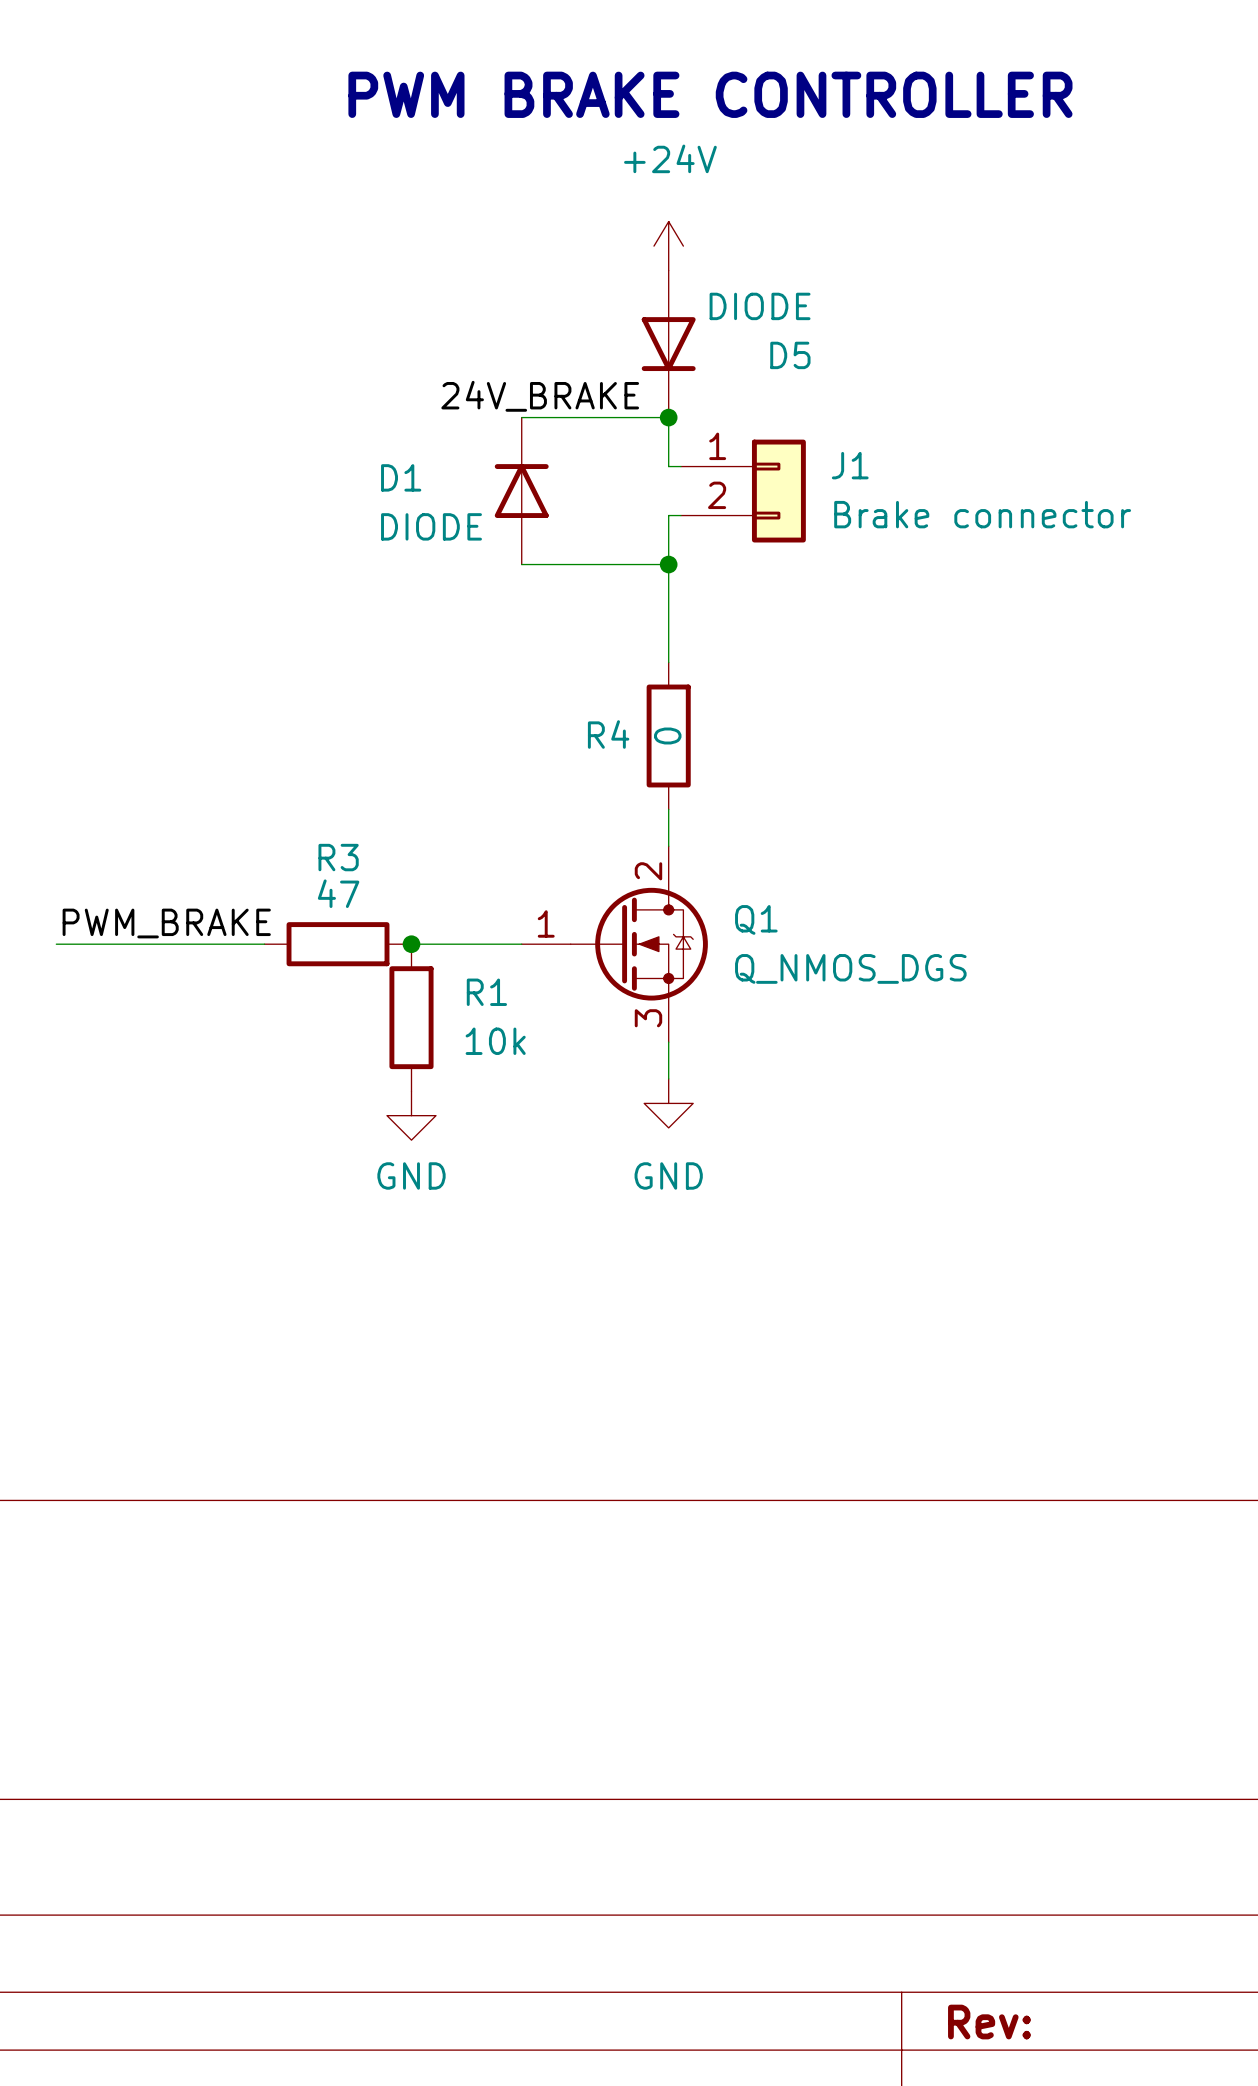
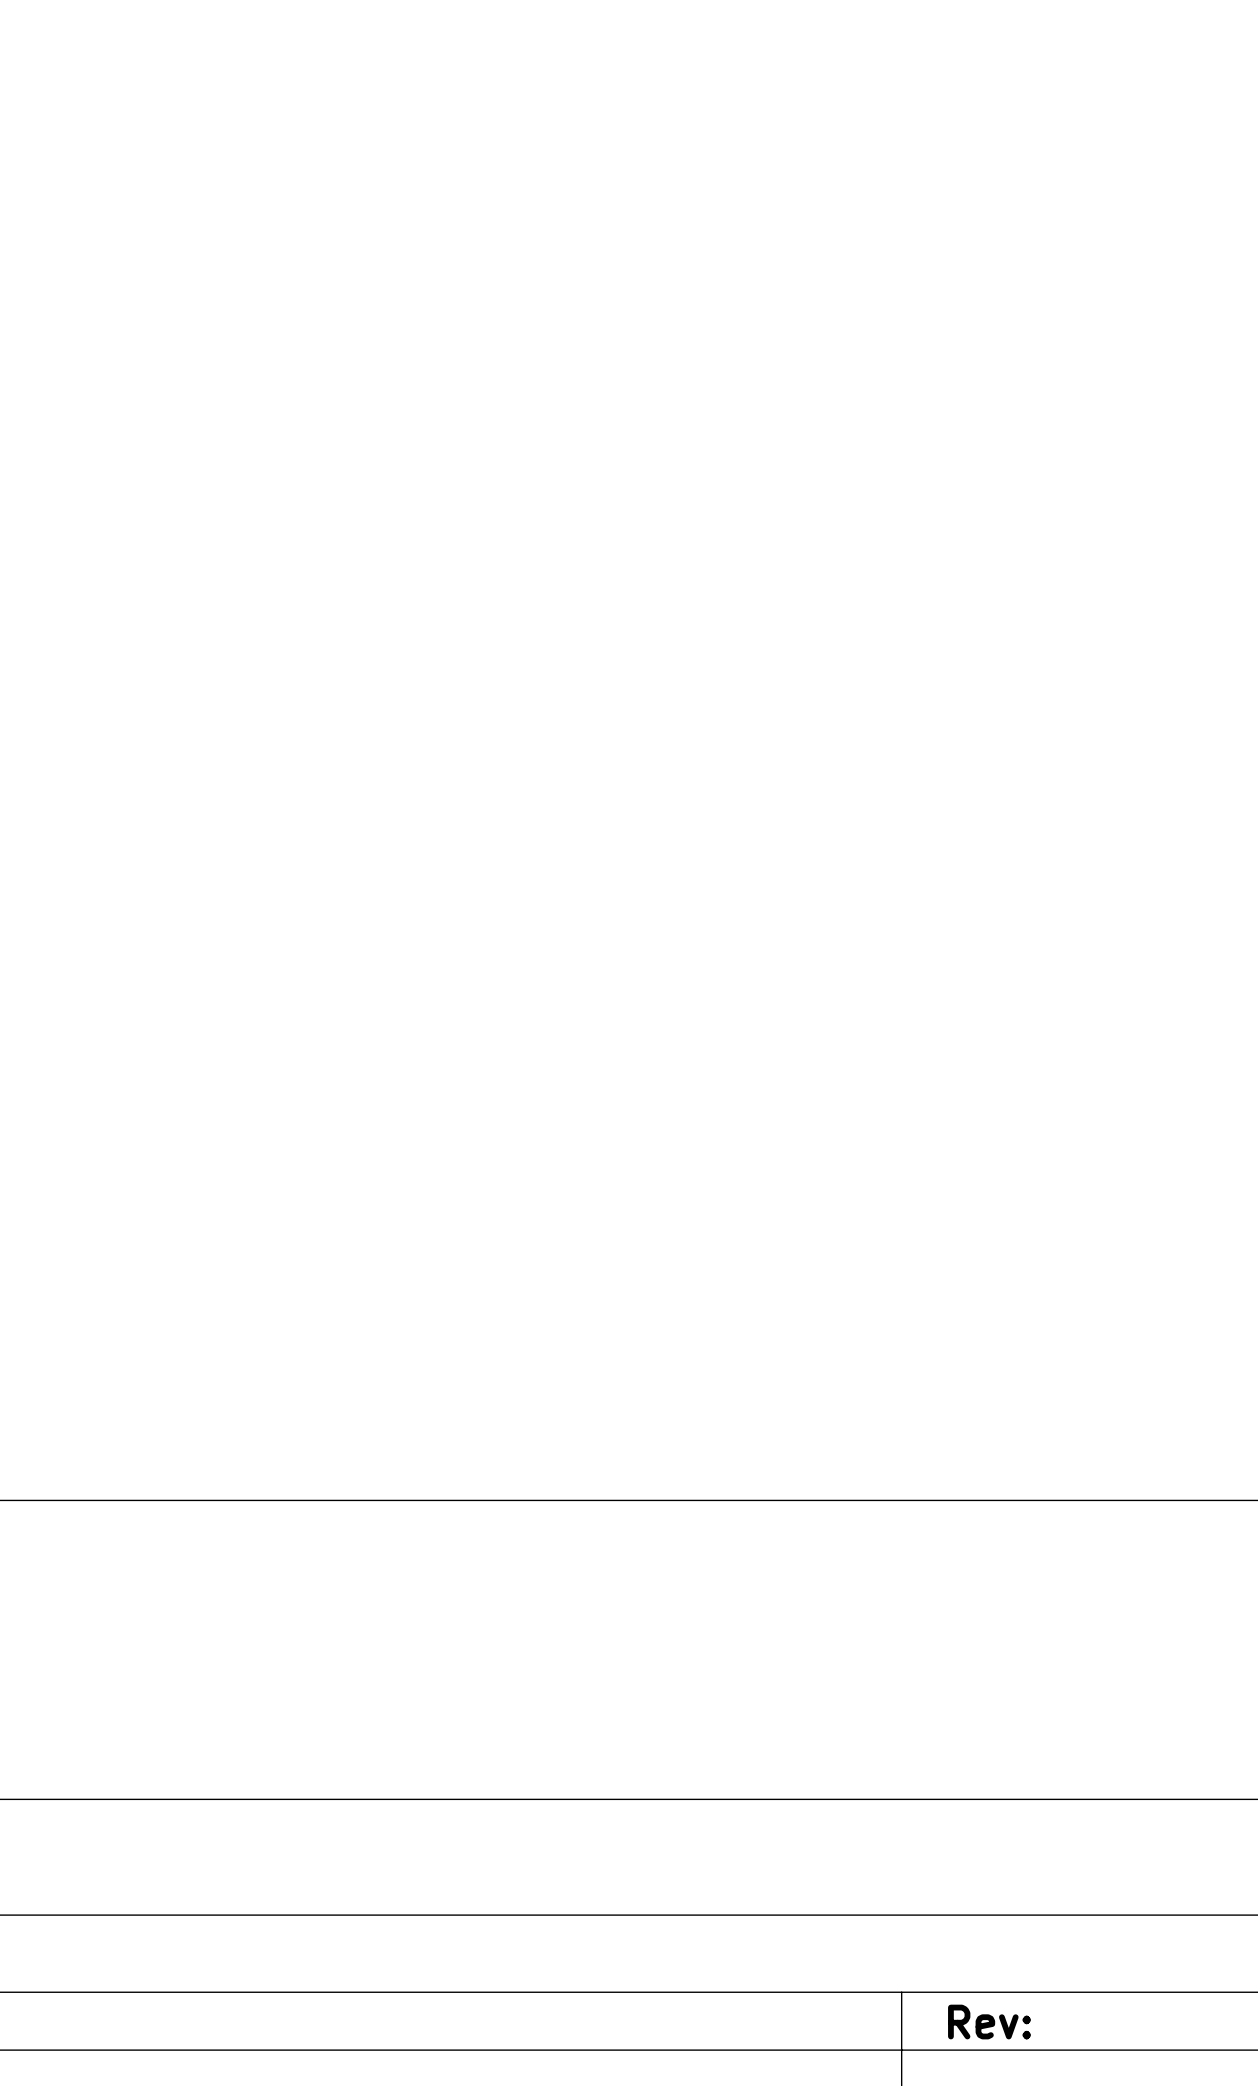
text: PWM BRAKE CONTROLLER (710, 94) -> none
power symbol: +24V (668, 246) -> none
D5: DIODE (668, 344) -> none
label: 24V_BRAKE (540, 396) -> none
wire: (521, 417) (668, 417) (668, 466) (680, 466) -> none
junction: (668, 417) -> none
D1: DIODE (521, 491) -> none
J1: Brake connector (743, 491) -> none
wire: (680, 515) (668, 515) (668, 662) -> none
wire: (521, 564) (668, 564) -> none
junction: (668, 564) -> none
R4: 0 (668, 735) -> none
wire: (668, 809) (668, 846) -> none
label: PWM_BRAKE (166, 923) -> none
wire: (56, 944) (264, 944) -> none
R3: 47 (338, 944) -> none
wire: (411, 944) (521, 944) -> none
junction: (411, 944) -> none
Q1: Q_NMOS_DGS (614, 944) -> none
R1: 10k (411, 1017) -> none
wire: (668, 1042) (668, 1078) -> none
power symbol: GND (668, 1103) -> none
power symbol: GND (411, 1115) -> none

